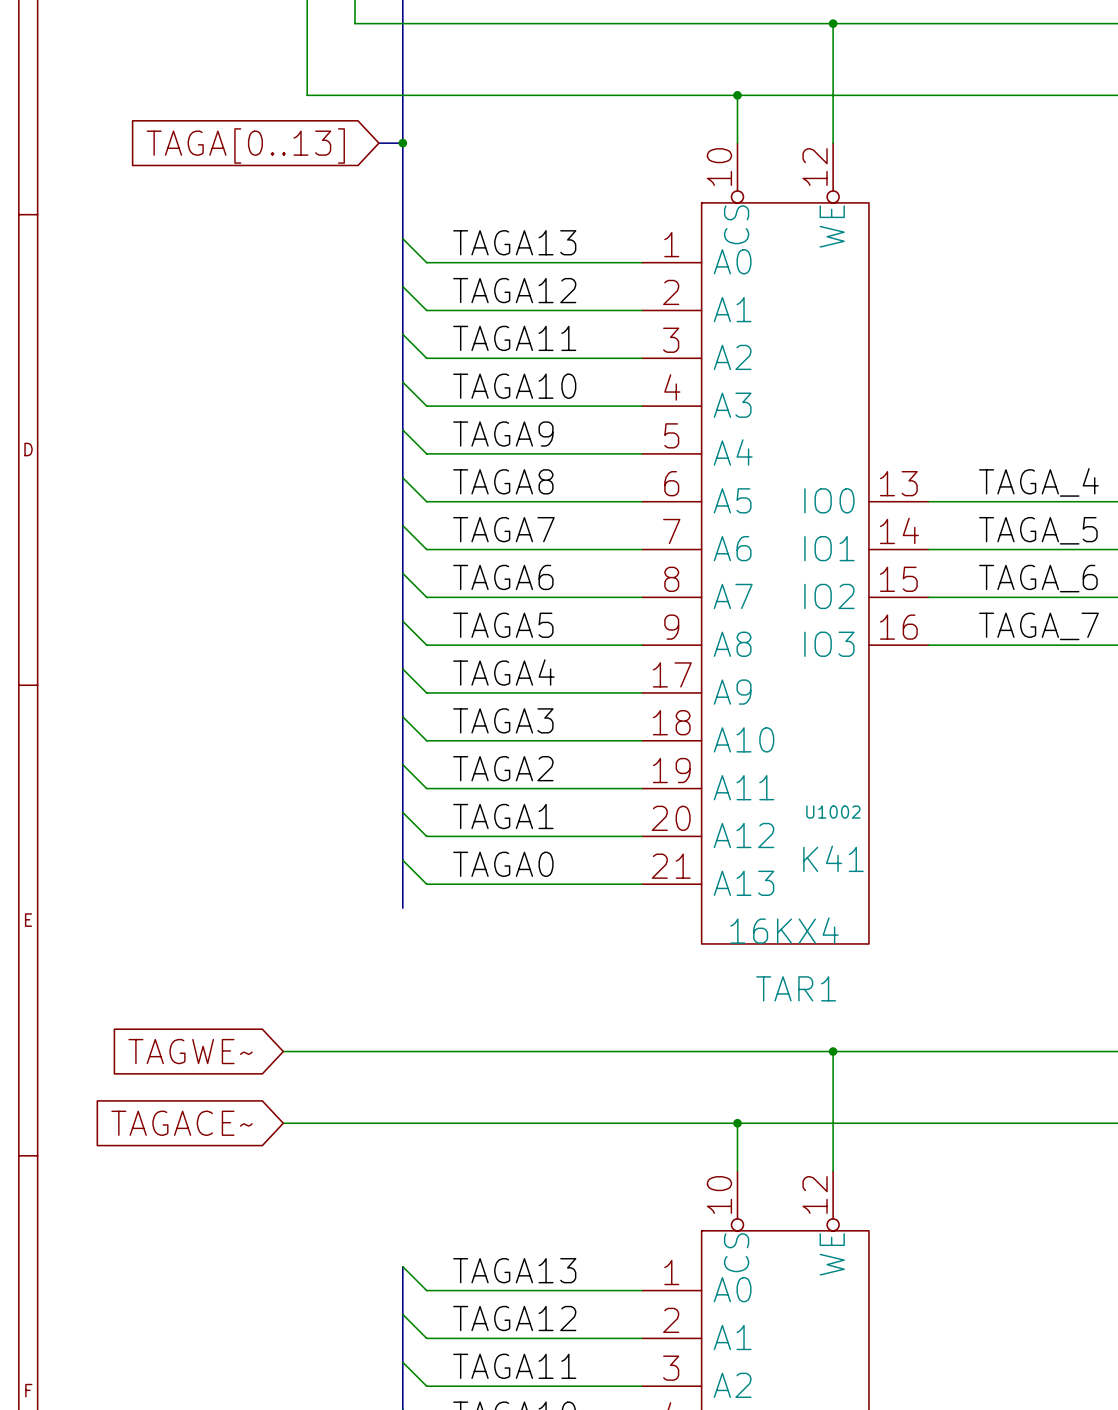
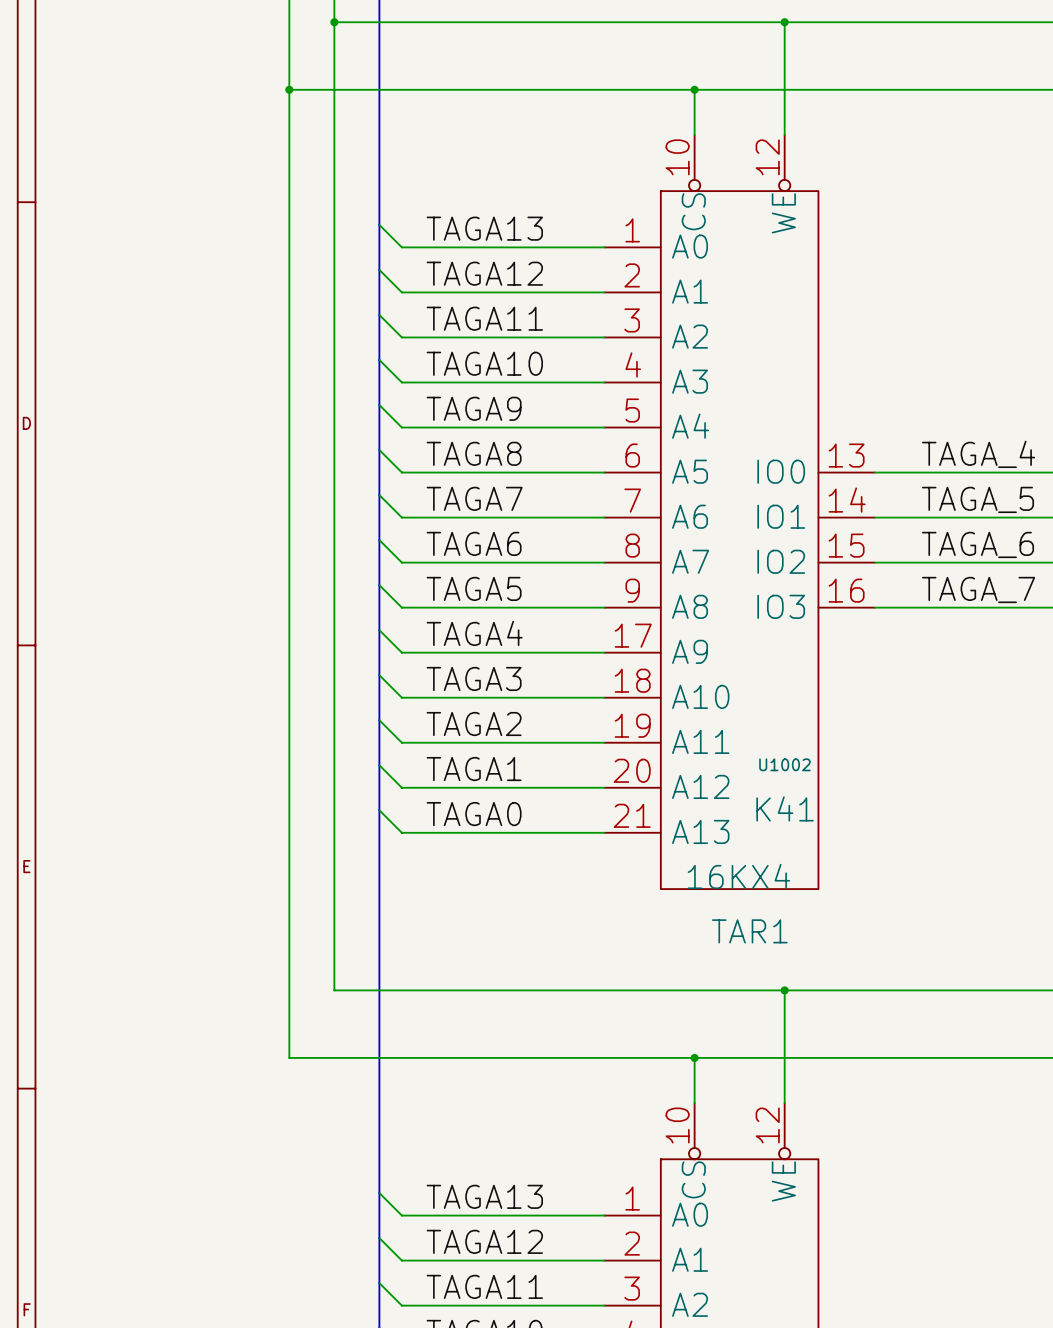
junction: none -> (334, 22)
junction: none -> (289, 89)
bus: (378, 143) (402, 143) -> none
junction: (402, 143) -> none
global label: TAGA[0..13] (245, 145) -> none
bus: none -> (379, 855) (379, 1193)
global label: TAGWE~ (190, 1051) -> none
wire: (283, 1051) (355, 1051) -> (334, 22) (334, 990)
global label: TAGACE~ (182, 1123) -> none
wire: (283, 1123) (307, 1123) -> (289, 89) (289, 1057)

